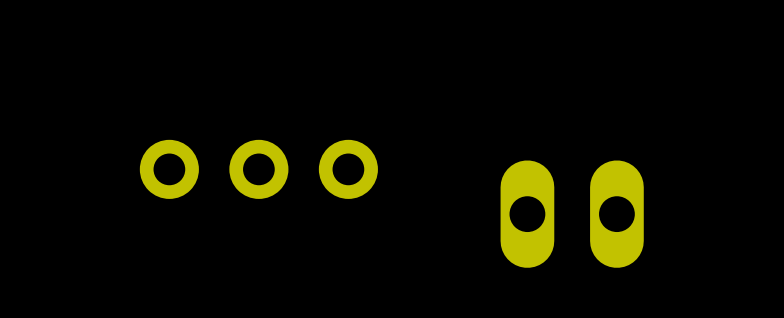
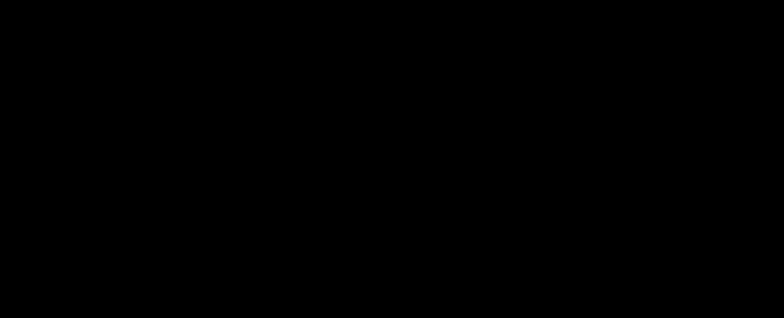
part: (258, 169) -> none
part: (572, 214) -> none

